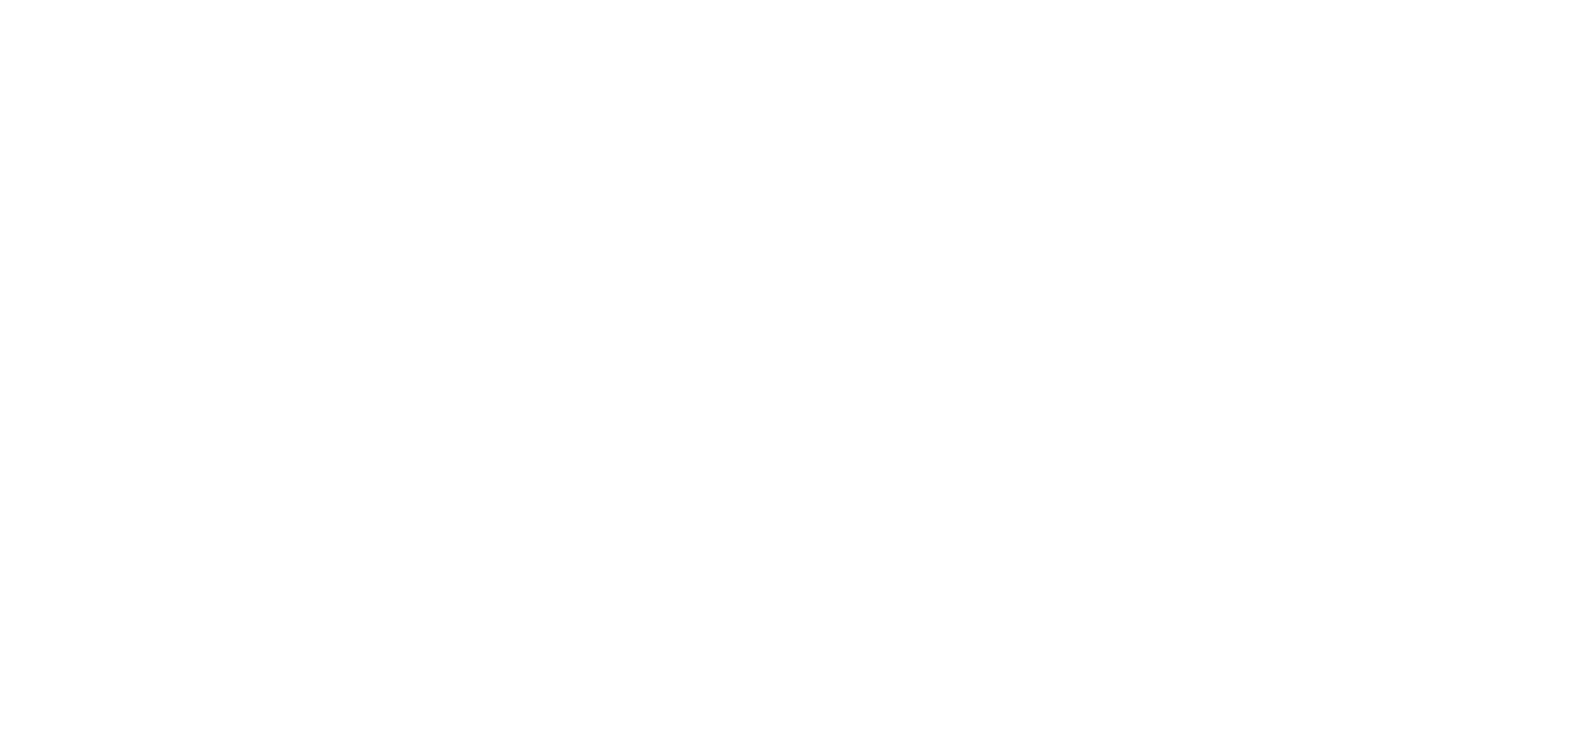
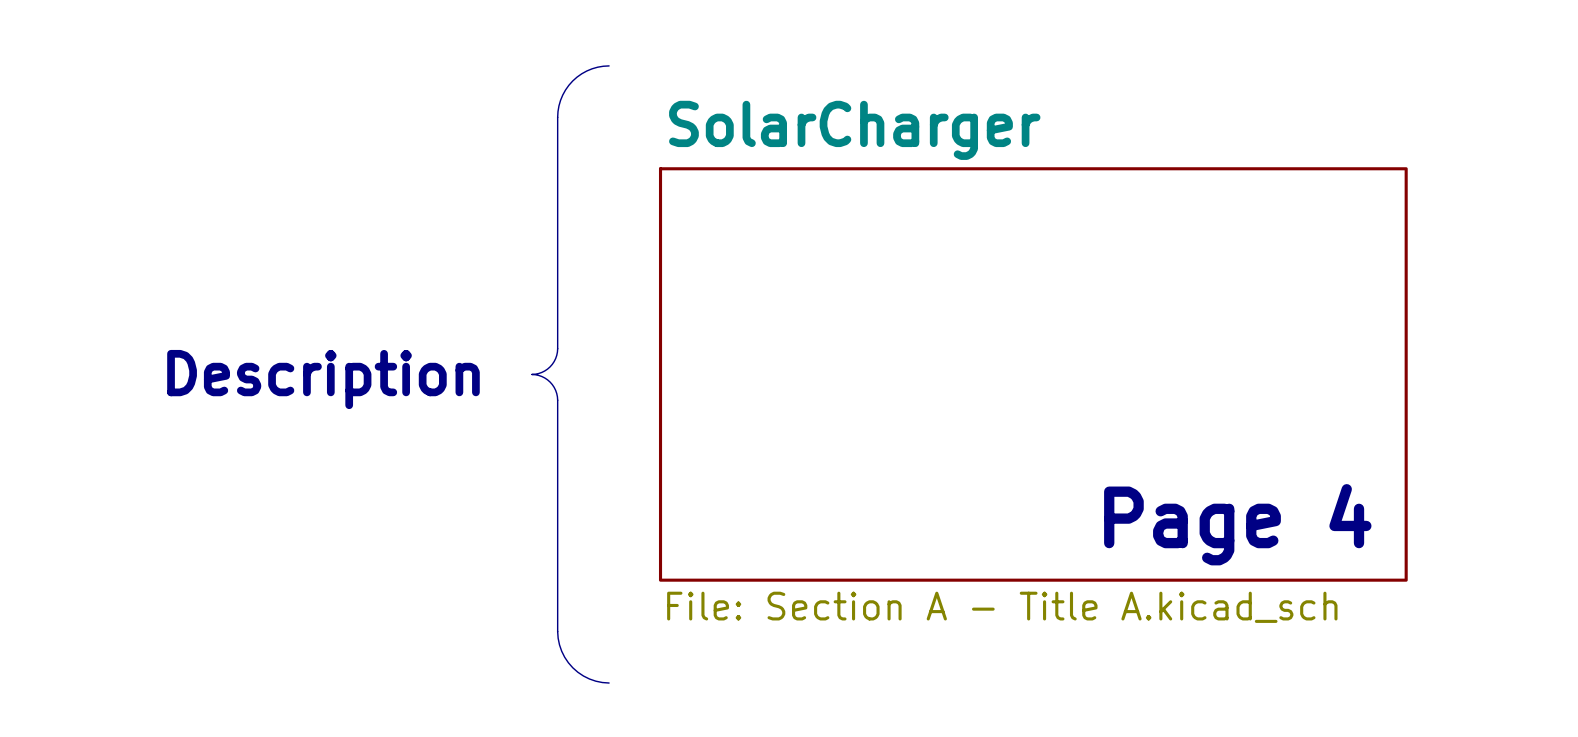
line: none -> (609, 65) (592, 68) (577, 77) (565, 89) (558, 105) (557, 352) (550, 366) (541, 372) (531, 374) (547, 379) (554, 387) (557, 396) (557, 631) (559, 644) (568, 662) (577, 672) (595, 681) (609, 683)
sheet SolarCharger: none -> File: Section A - Title A.kicad_sch (1033, 374)
text: none -> Description (323, 379)
text: none -> Page 4 (1237, 524)

